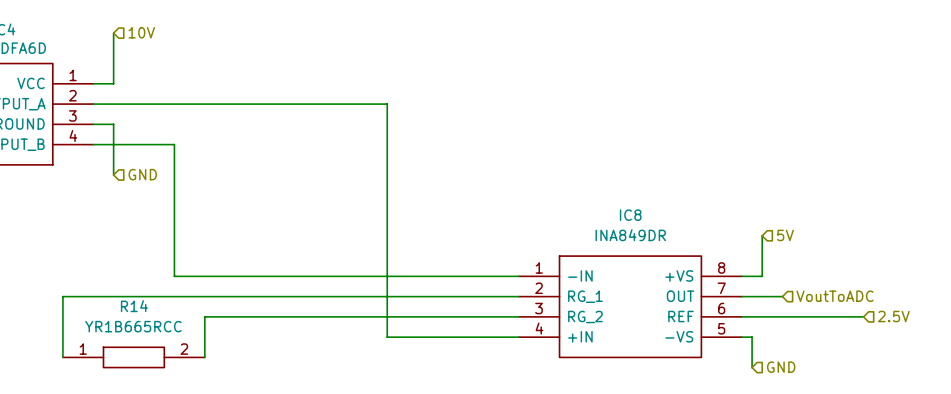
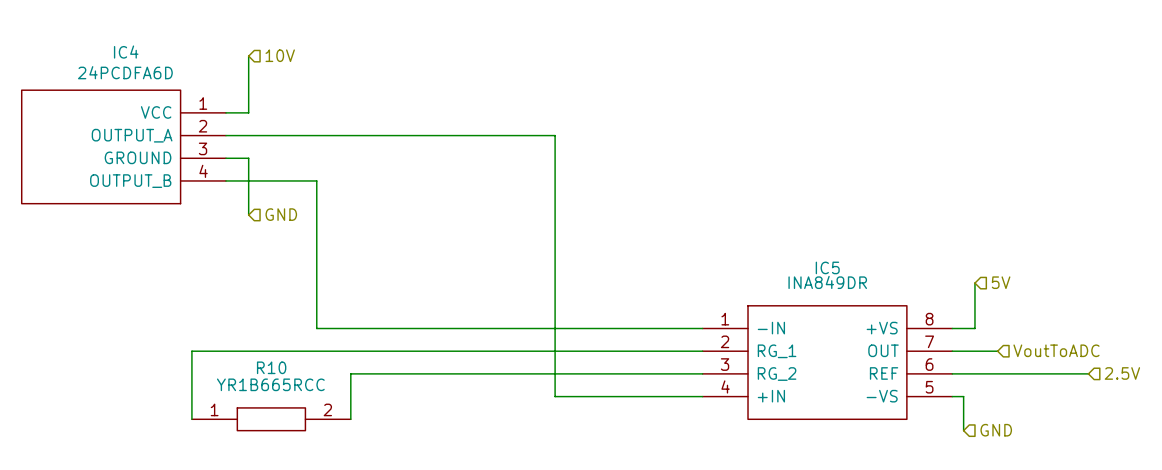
IC8 name: IC8 (630, 215) -> IC5 (827, 267)
R14 name: R14 (134, 306) -> R10 (271, 367)

